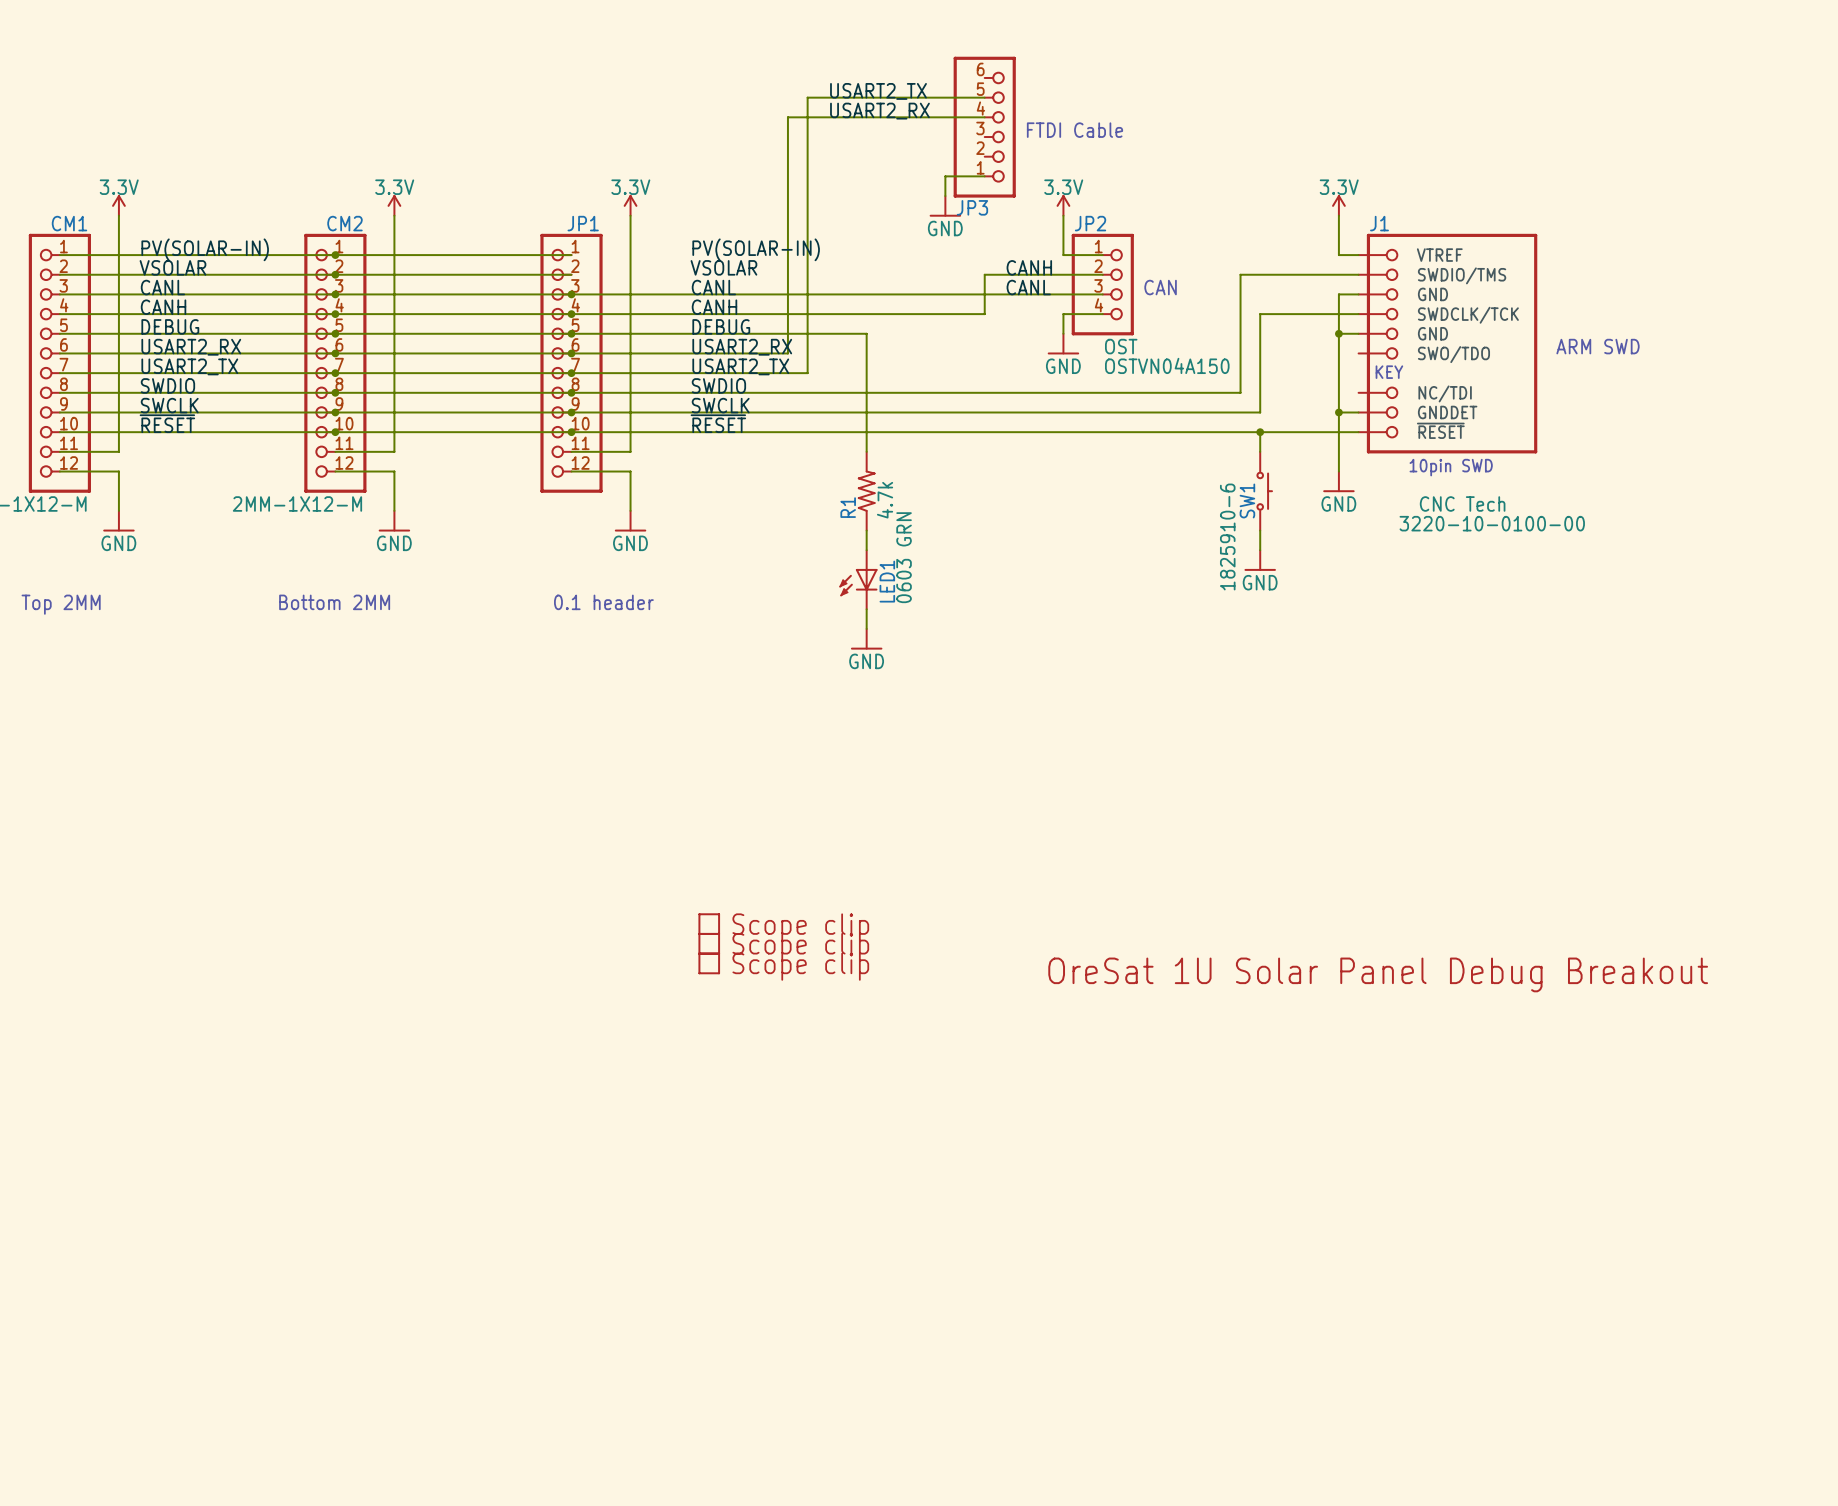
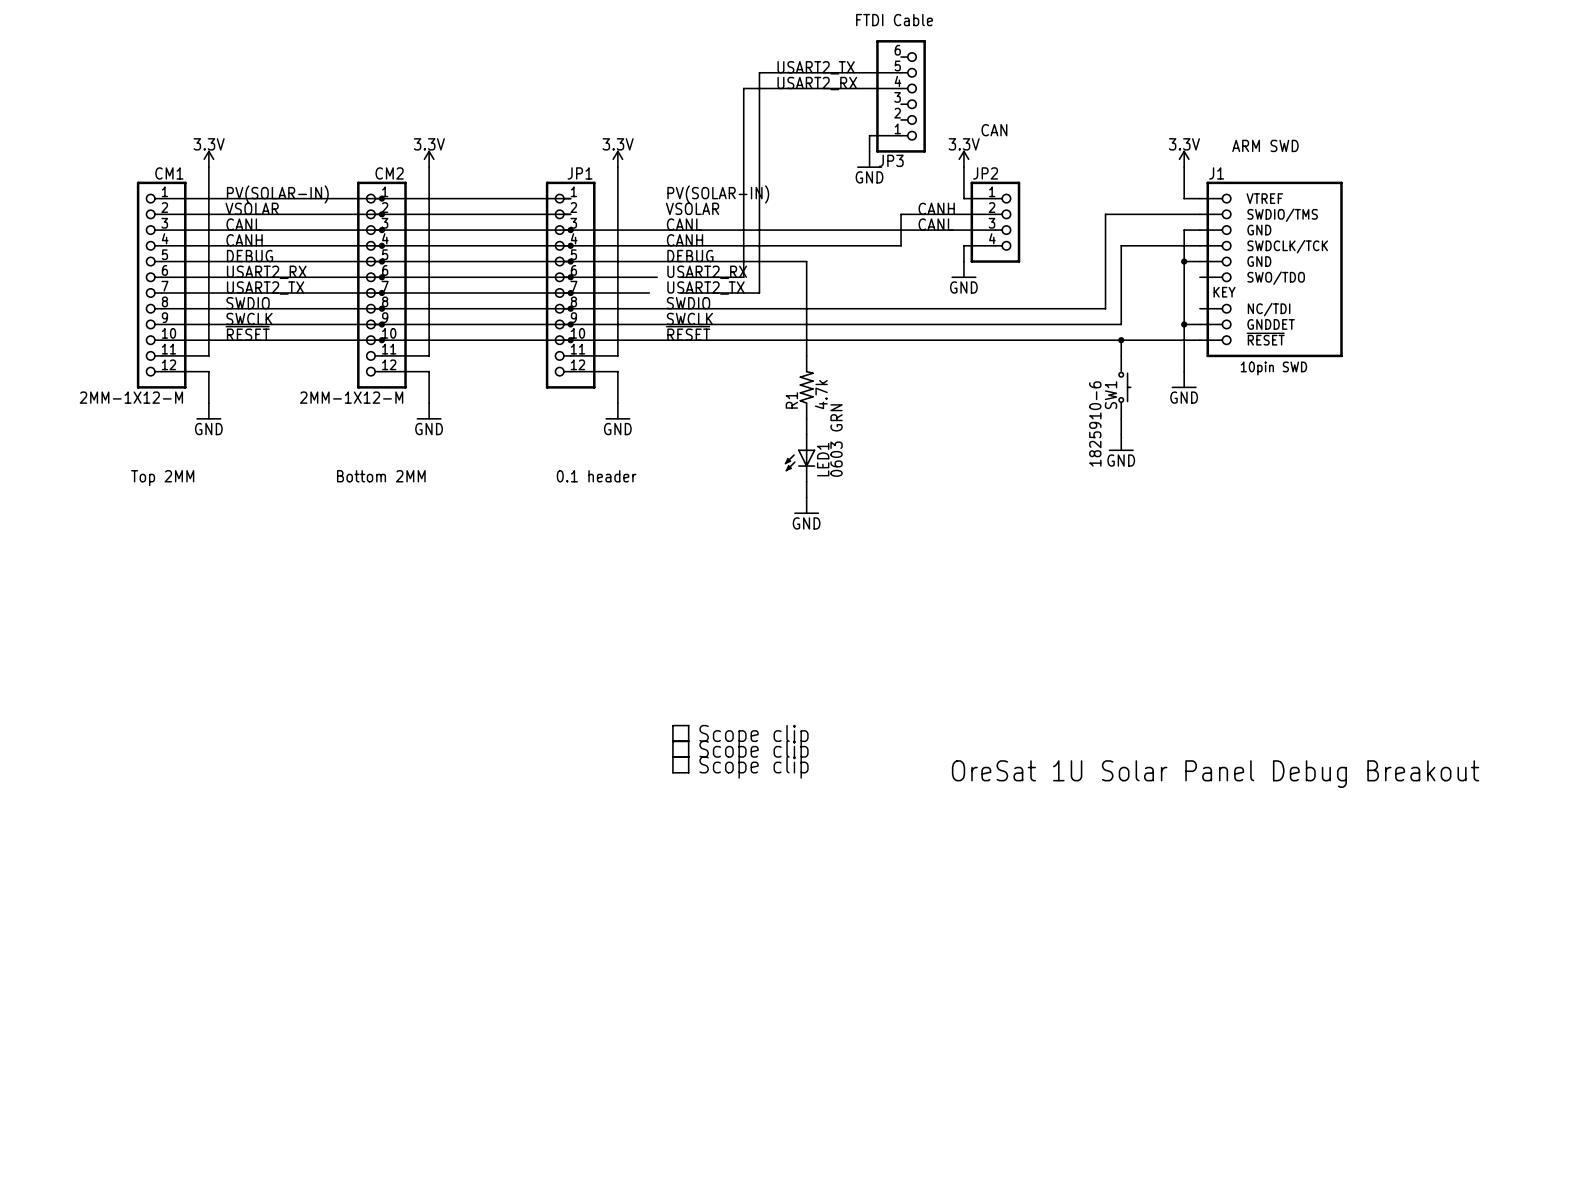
text position: FTDI Cable (1074, 130) -> FTDI Cable (894, 20)
text: none -> ARM SWD (1265, 145)
text position: CAN (1160, 287) -> CAN (994, 130)
JP2 text: OST (1121, 346) -> none
text: ARM SWD (1598, 346) -> none
wire: (679, 353) (709, 353) -> none
JP2 text: OSTVN04A150 (1167, 365) -> none
wire: (669, 373) (709, 373) -> none
J1 text: CNC Tech (1462, 503) -> none
J1 text: 3220-10-0100-00 (1492, 523) -> none

